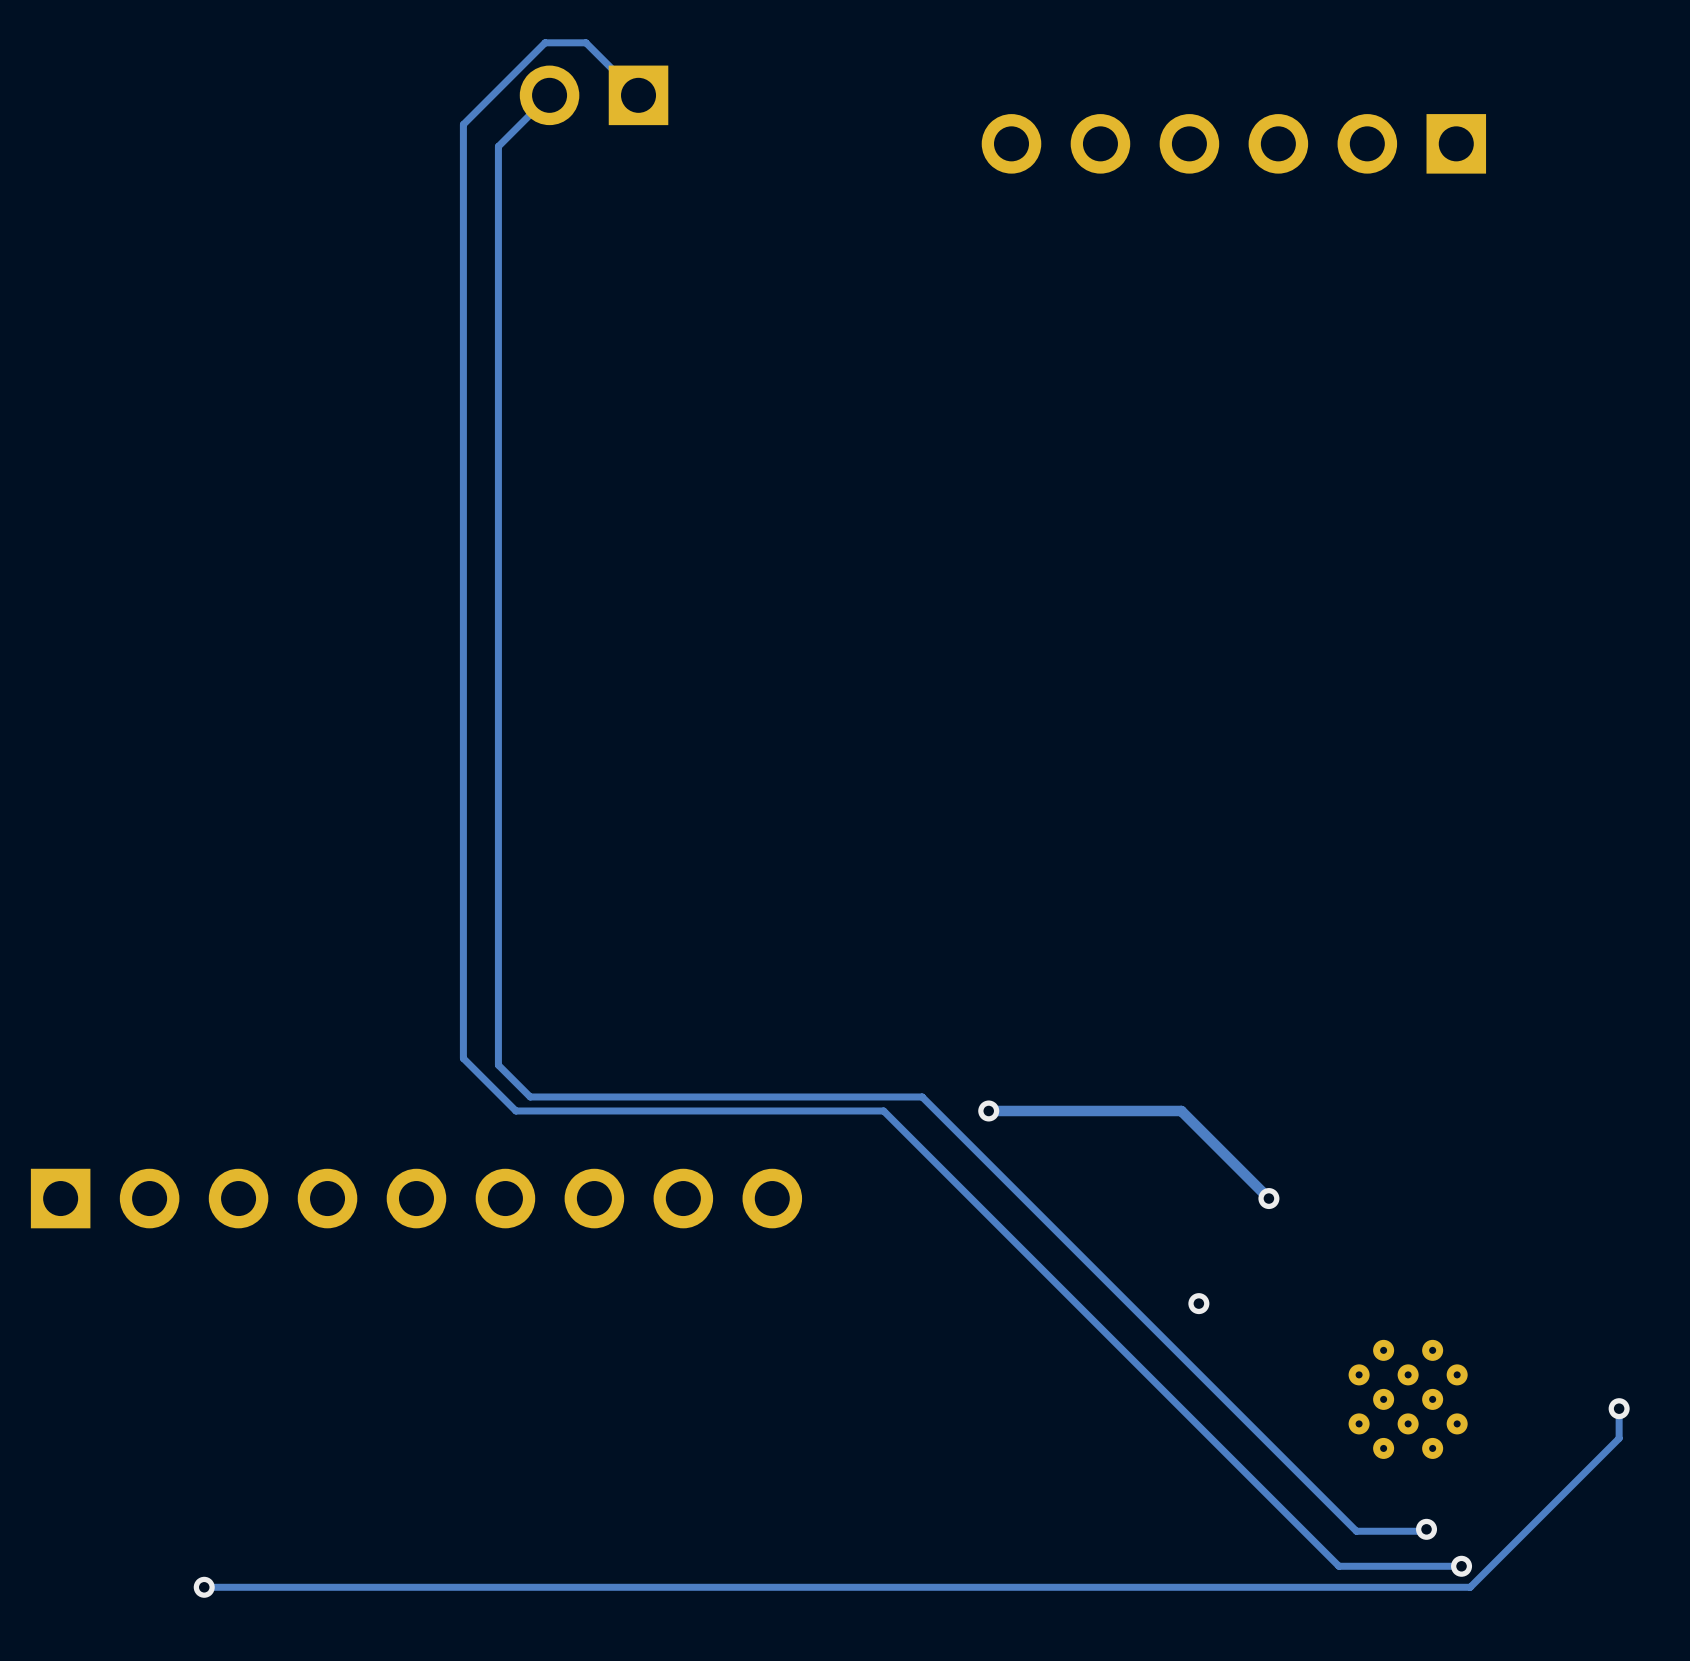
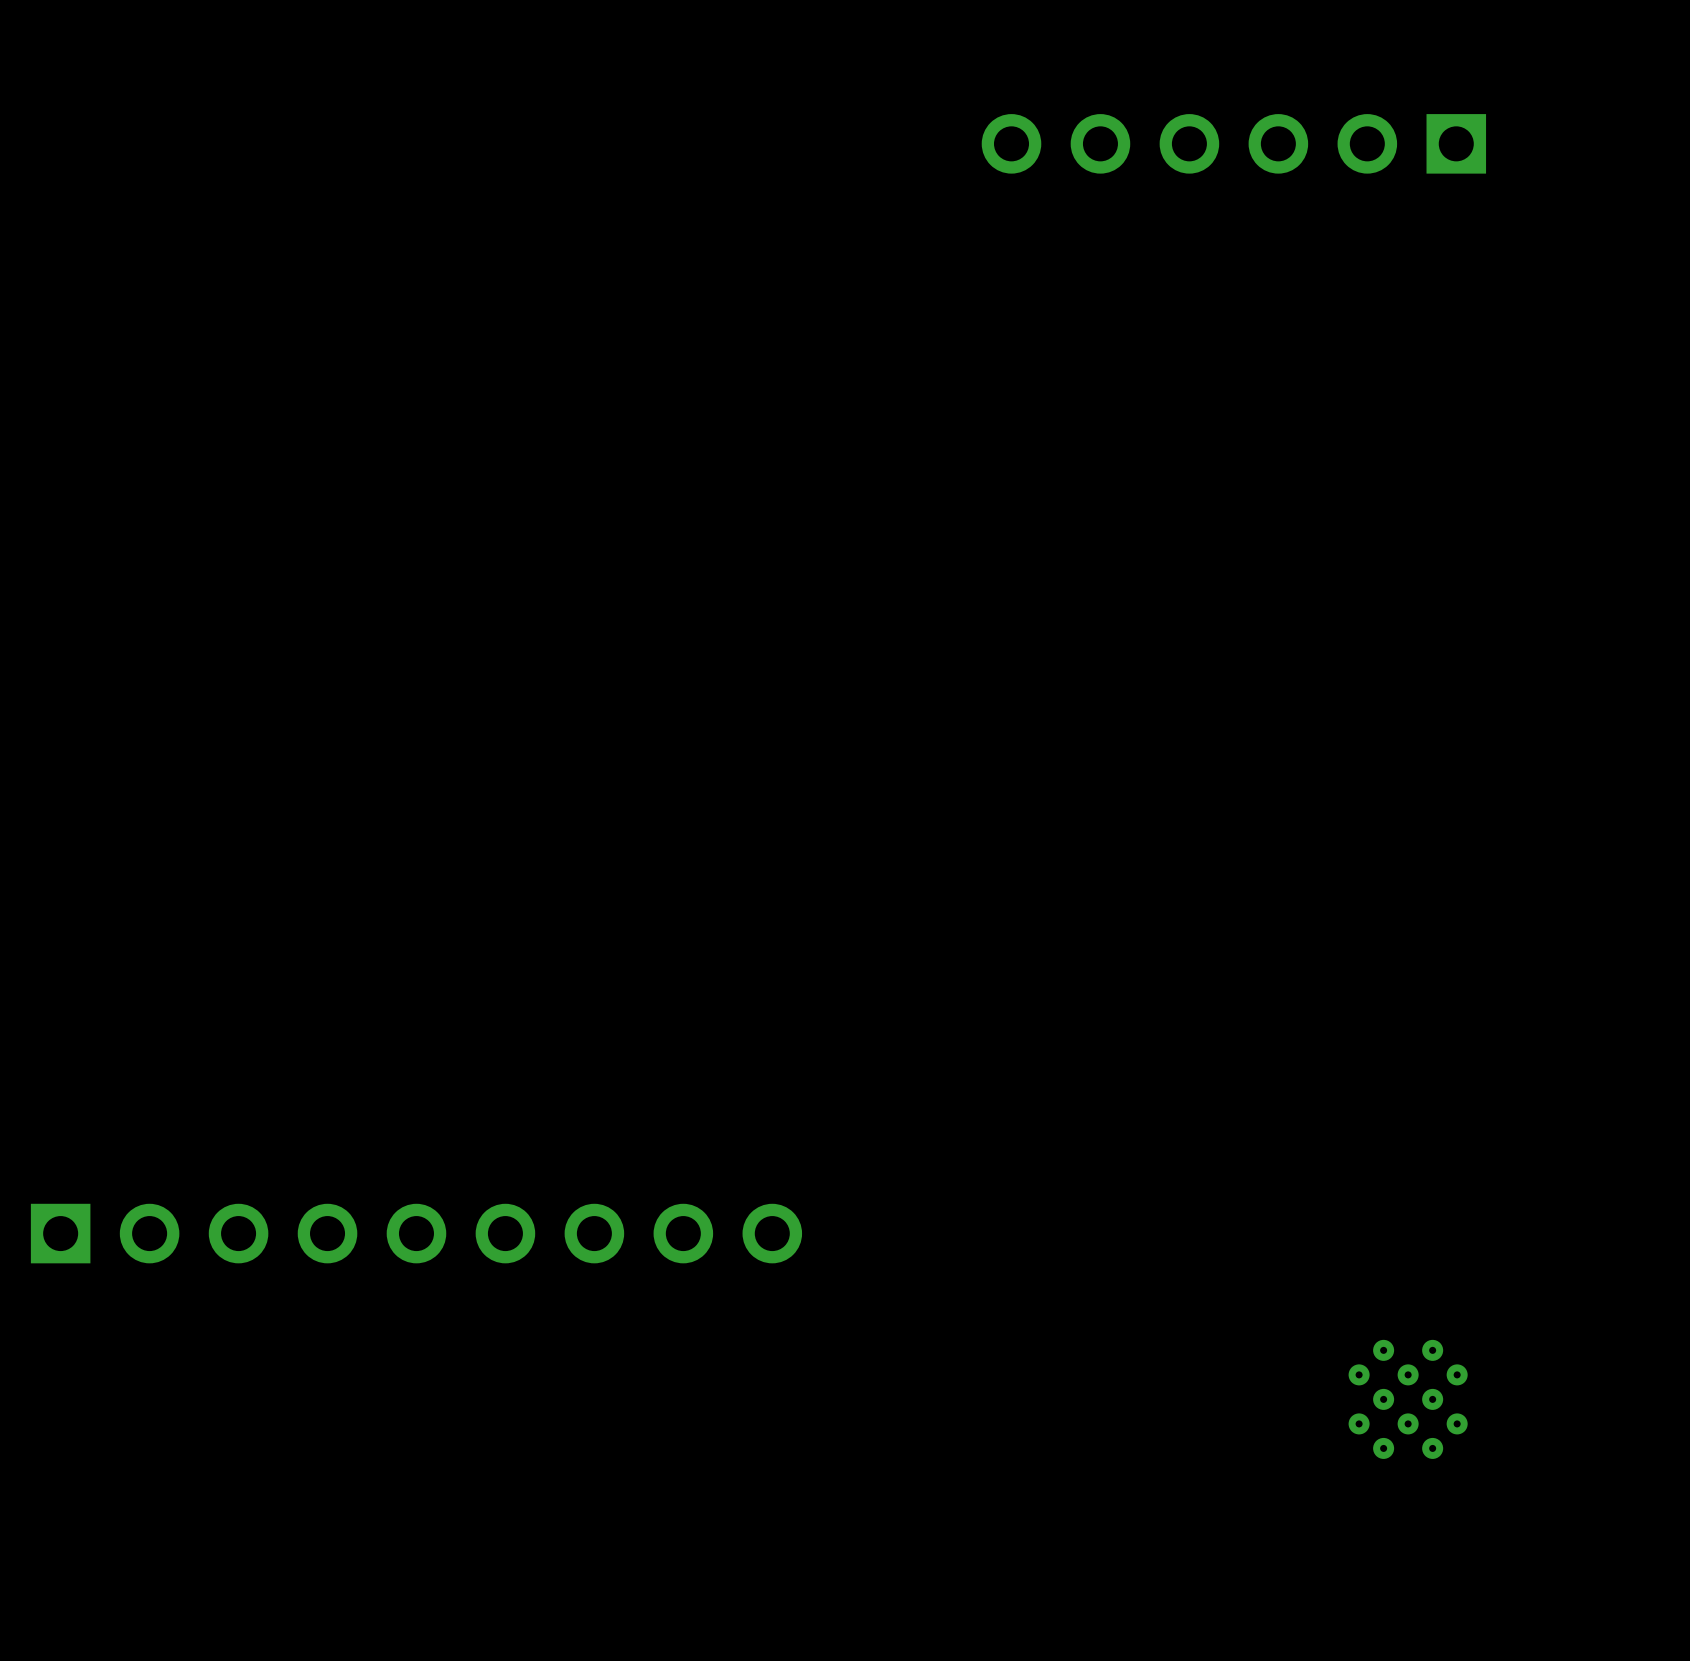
track: (549, 95) (498, 146) (498, 1065) (530, 1096) (922, 1096) (1356, 1531) (1424, 1531) (1426, 1529) -> none
part: (594, 95) -> none
track: (638, 95) (585, 42) (545, 42) (463, 124) (463, 1058) (515, 1110) (883, 1110) (1338, 1566) (1461, 1566) -> none
track: (988, 1110) (1181, 1110) (1268, 1198) -> none
via: (988, 1110) -> none
part position: (416, 1198) -> (416, 1233)
via: (1268, 1198) -> none
via: (1198, 1303) -> none
track: (1619, 1408) (1619, 1438) (1470, 1587) (204, 1587) -> none
via: (1619, 1408) -> none
via: (1426, 1529) -> none
via: (1461, 1566) -> none
via: (204, 1587) -> none

